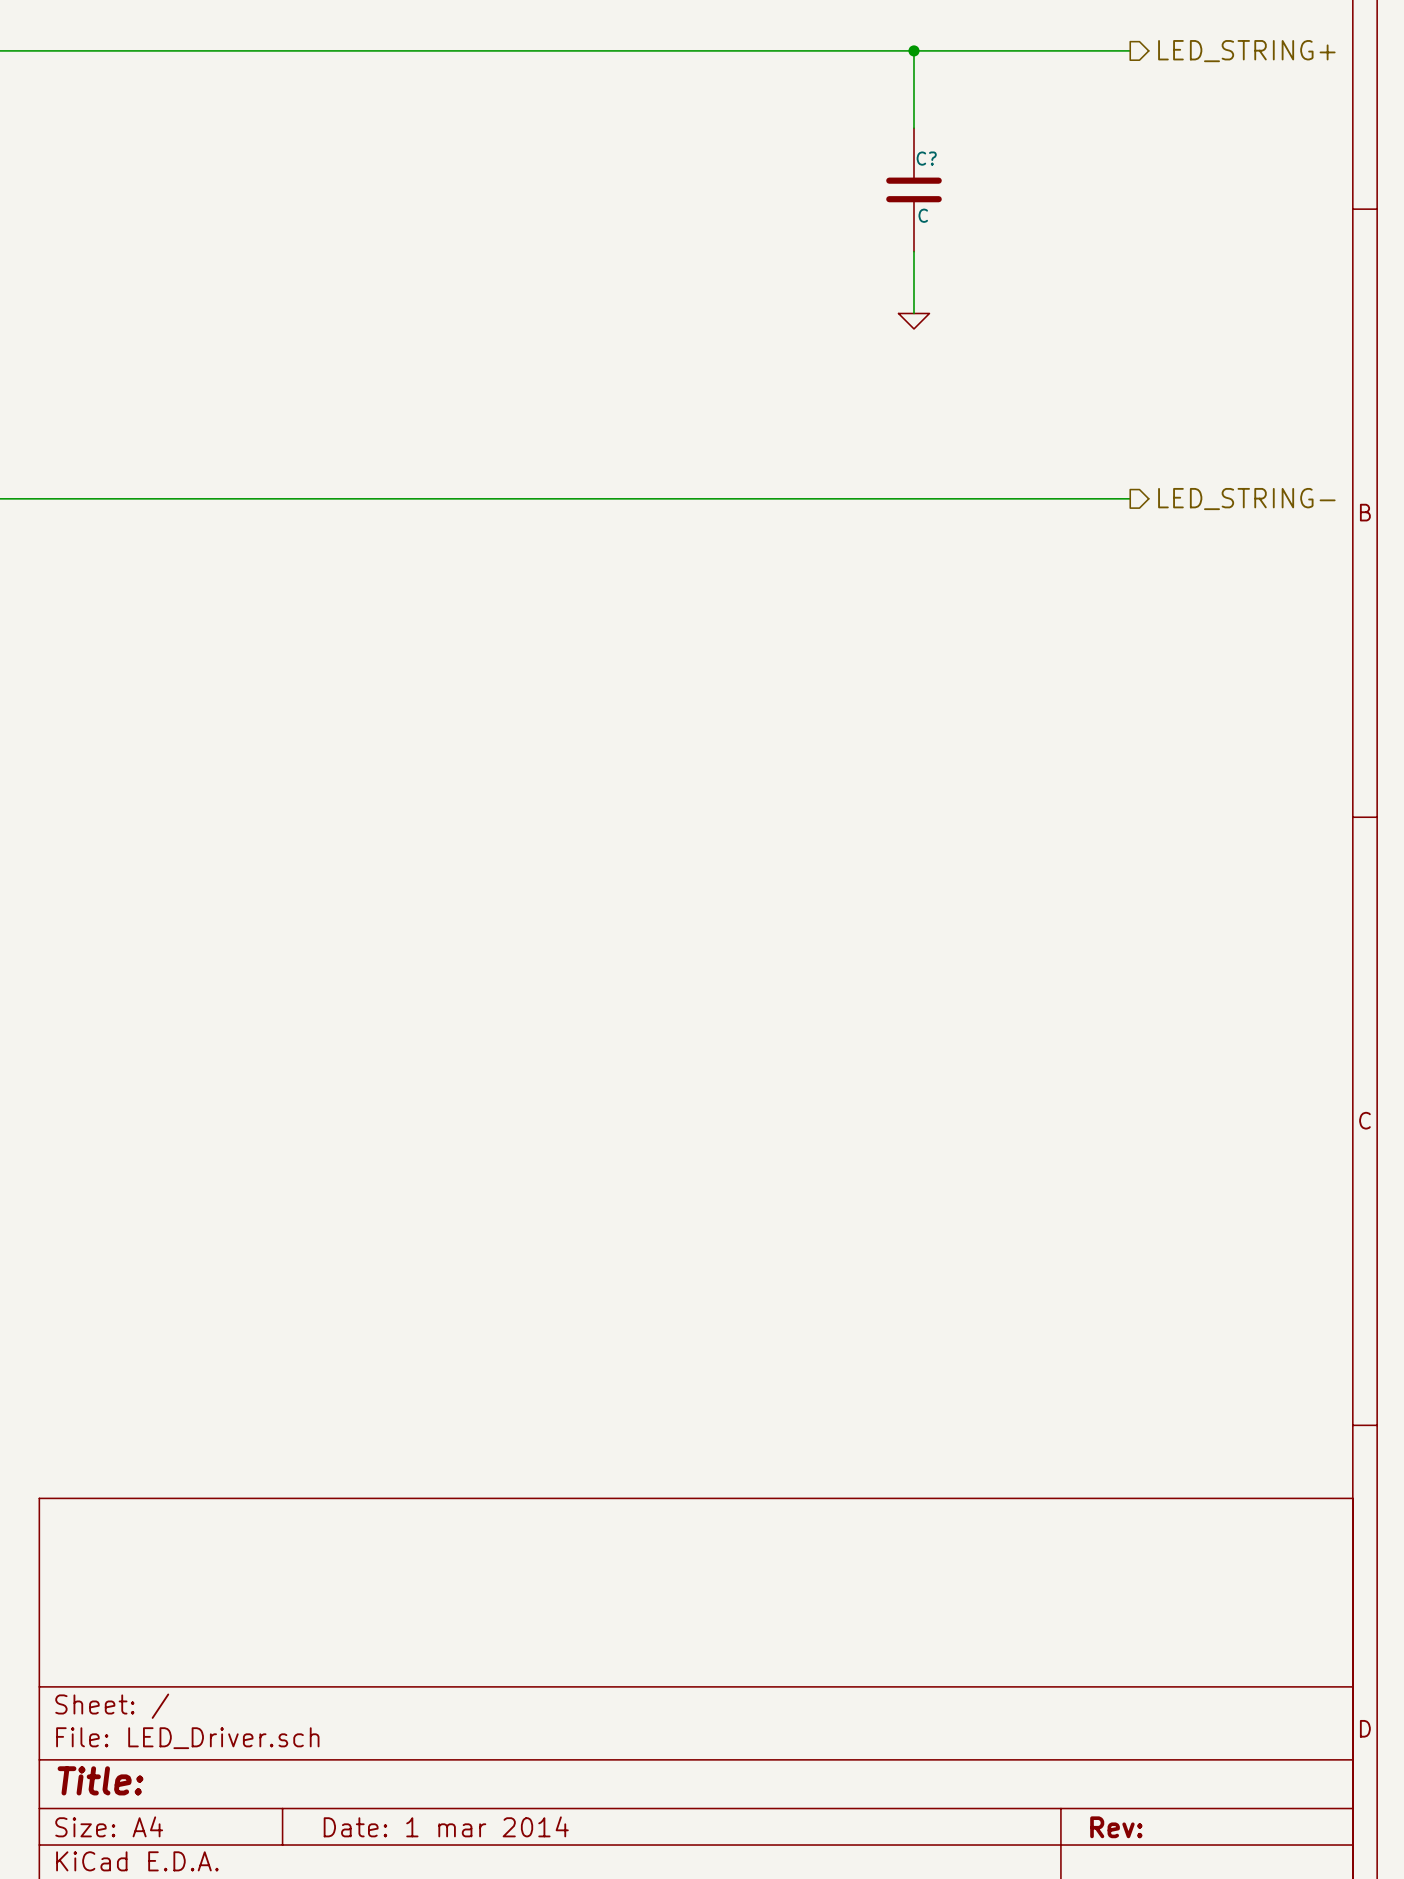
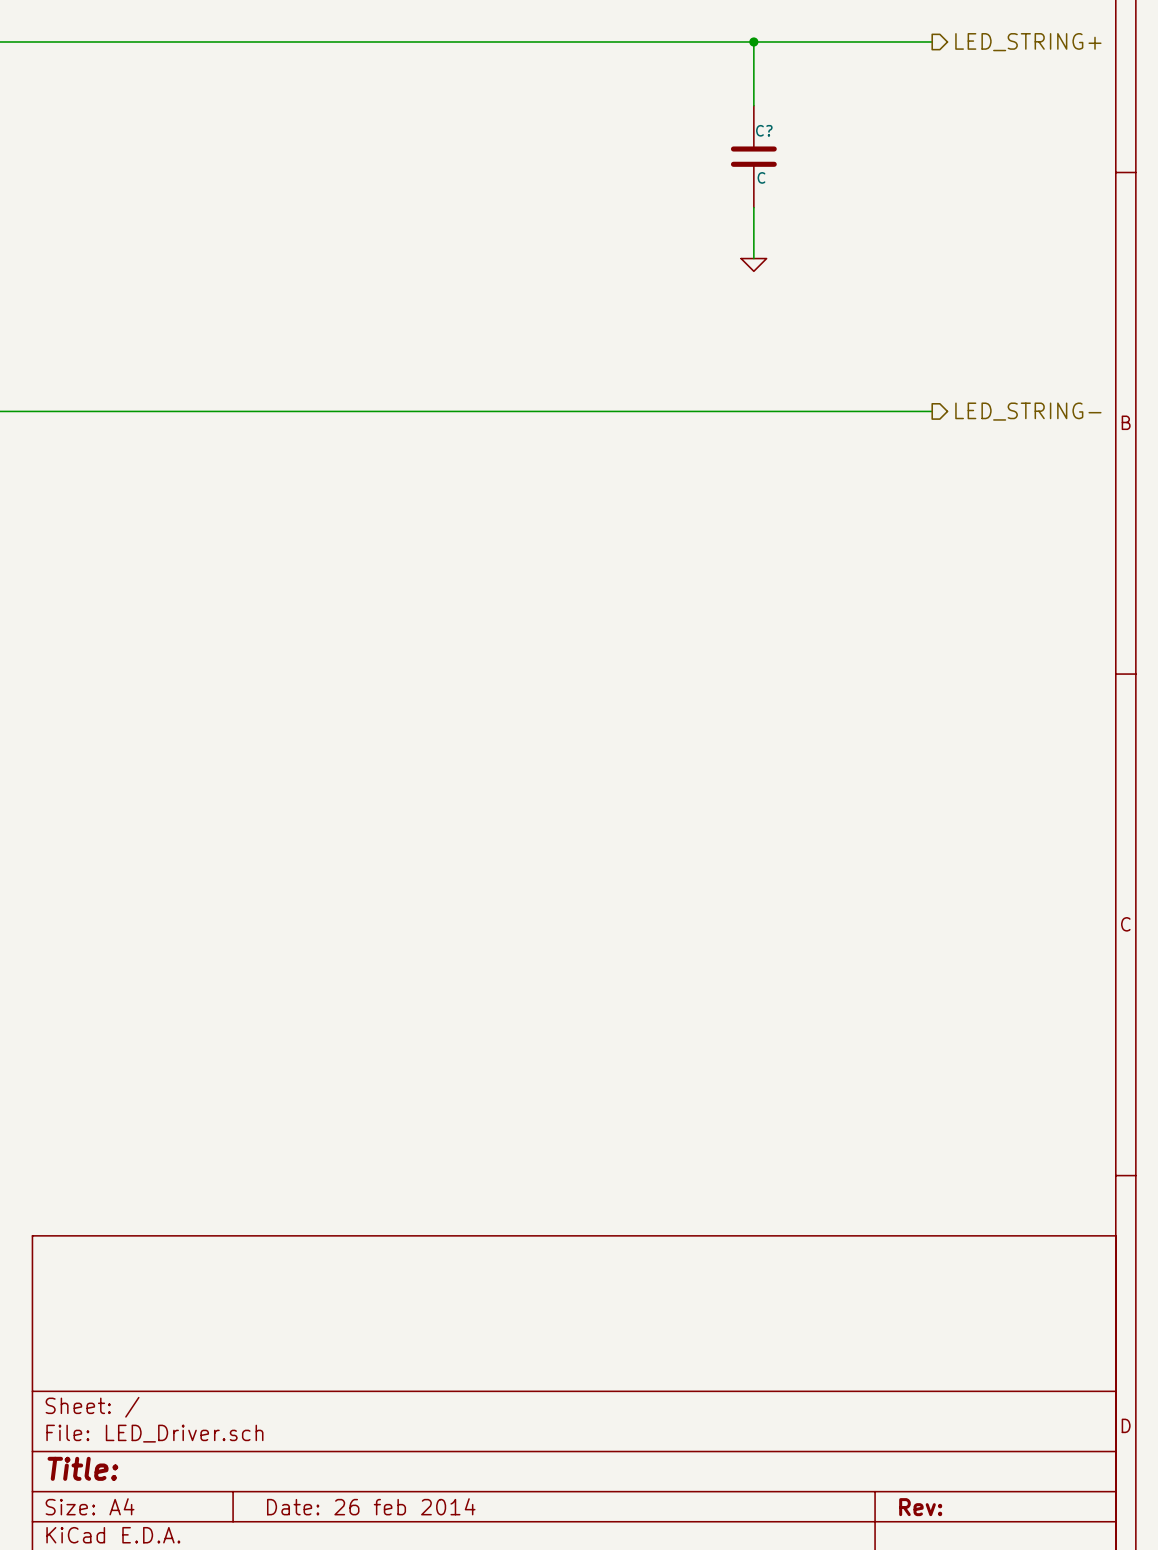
title block: Date: 1 mar 2014 (446, 1826) -> Date: 26 feb 2014 (371, 1506)

